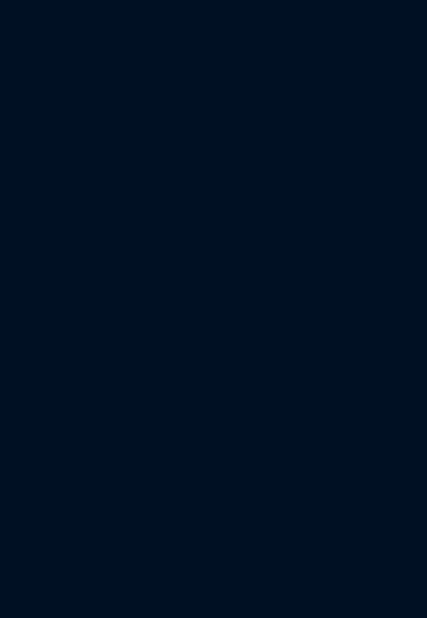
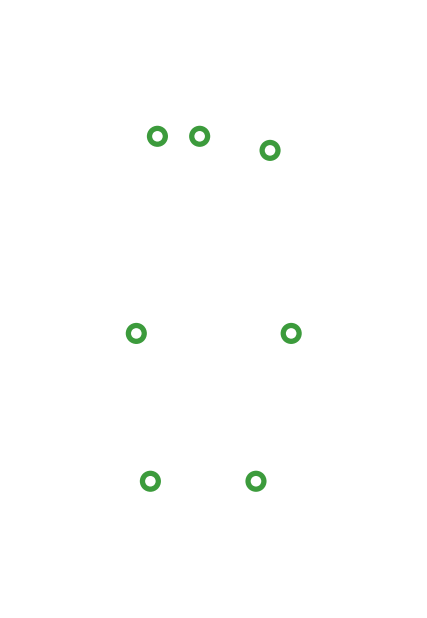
via: none -> (157, 136)
via: none -> (199, 136)
via: none -> (270, 150)
via: none -> (136, 333)
via: none -> (291, 333)
via: none -> (150, 481)
via: none -> (255, 481)

